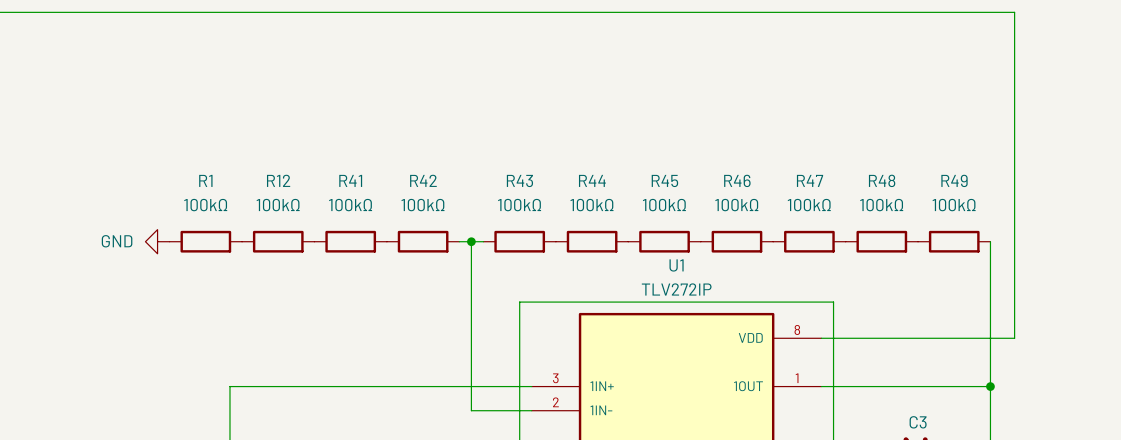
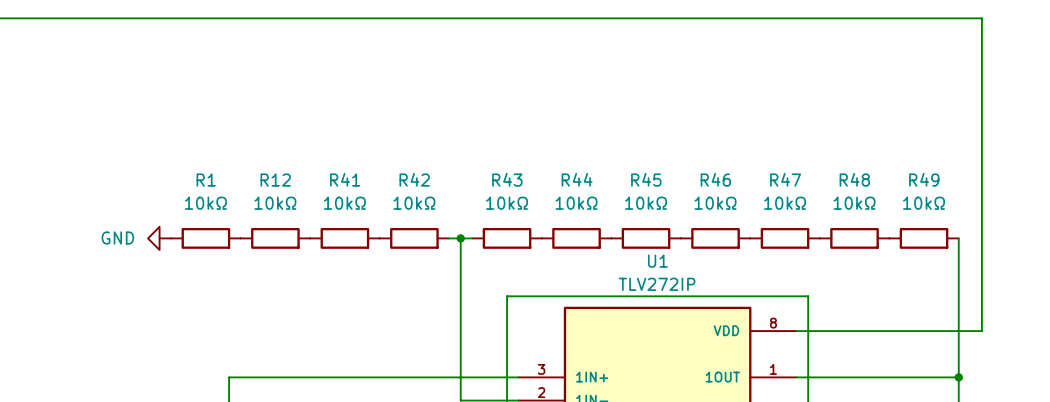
R1 value: 100kΩ (205, 205) -> 10kΩ (205, 203)
R12 value: 100kΩ (278, 205) -> 10kΩ (275, 203)
R41 value: 100kΩ (350, 205) -> 10kΩ (344, 203)
R42 value: 100kΩ (423, 205) -> 10kΩ (414, 203)
R43 value: 100kΩ (519, 205) -> 10kΩ (507, 203)
R44 value: 100kΩ (592, 205) -> 10kΩ (576, 203)
R45 value: 100kΩ (664, 205) -> 10kΩ (646, 203)
R46 value: 100kΩ (736, 205) -> 10kΩ (715, 203)
R47 value: 100kΩ (809, 205) -> 10kΩ (785, 203)
R48 value: 100kΩ (881, 205) -> 10kΩ (854, 203)
R49 value: 100kΩ (954, 205) -> 10kΩ (924, 203)

